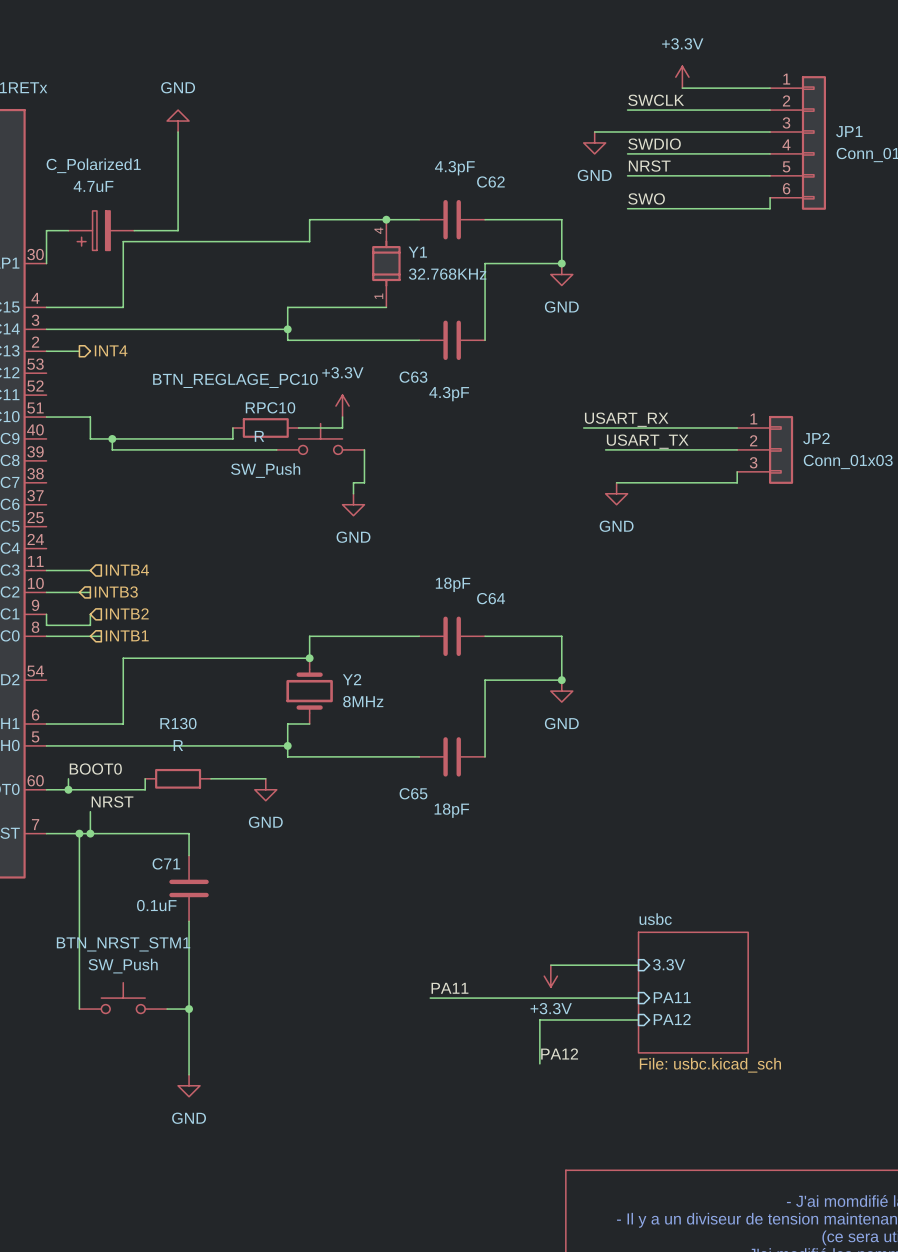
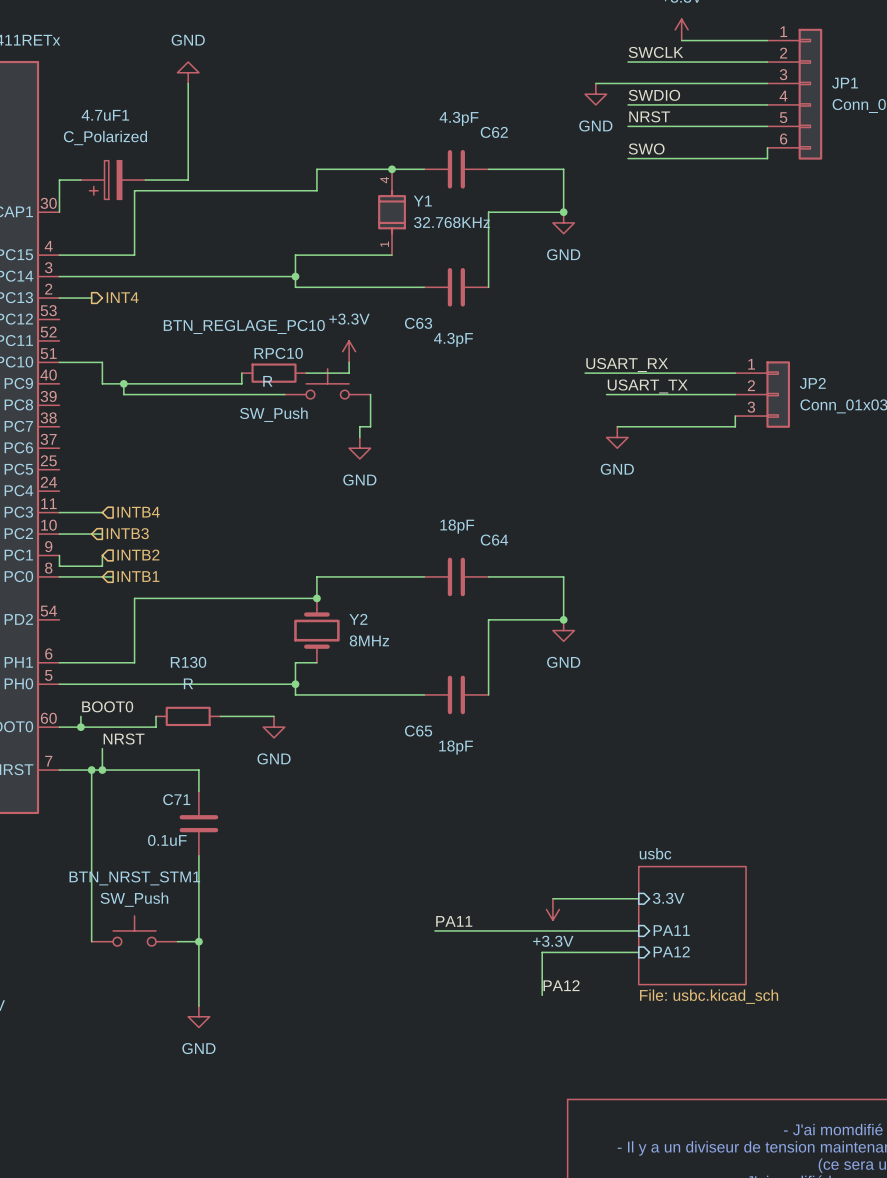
C_Polarized1 name: C_Polarized1 (93, 165) -> 4.7uF1 (105, 115)
C_Polarized1 value: 4.7uF (93, 186) -> C_Polarized (105, 137)

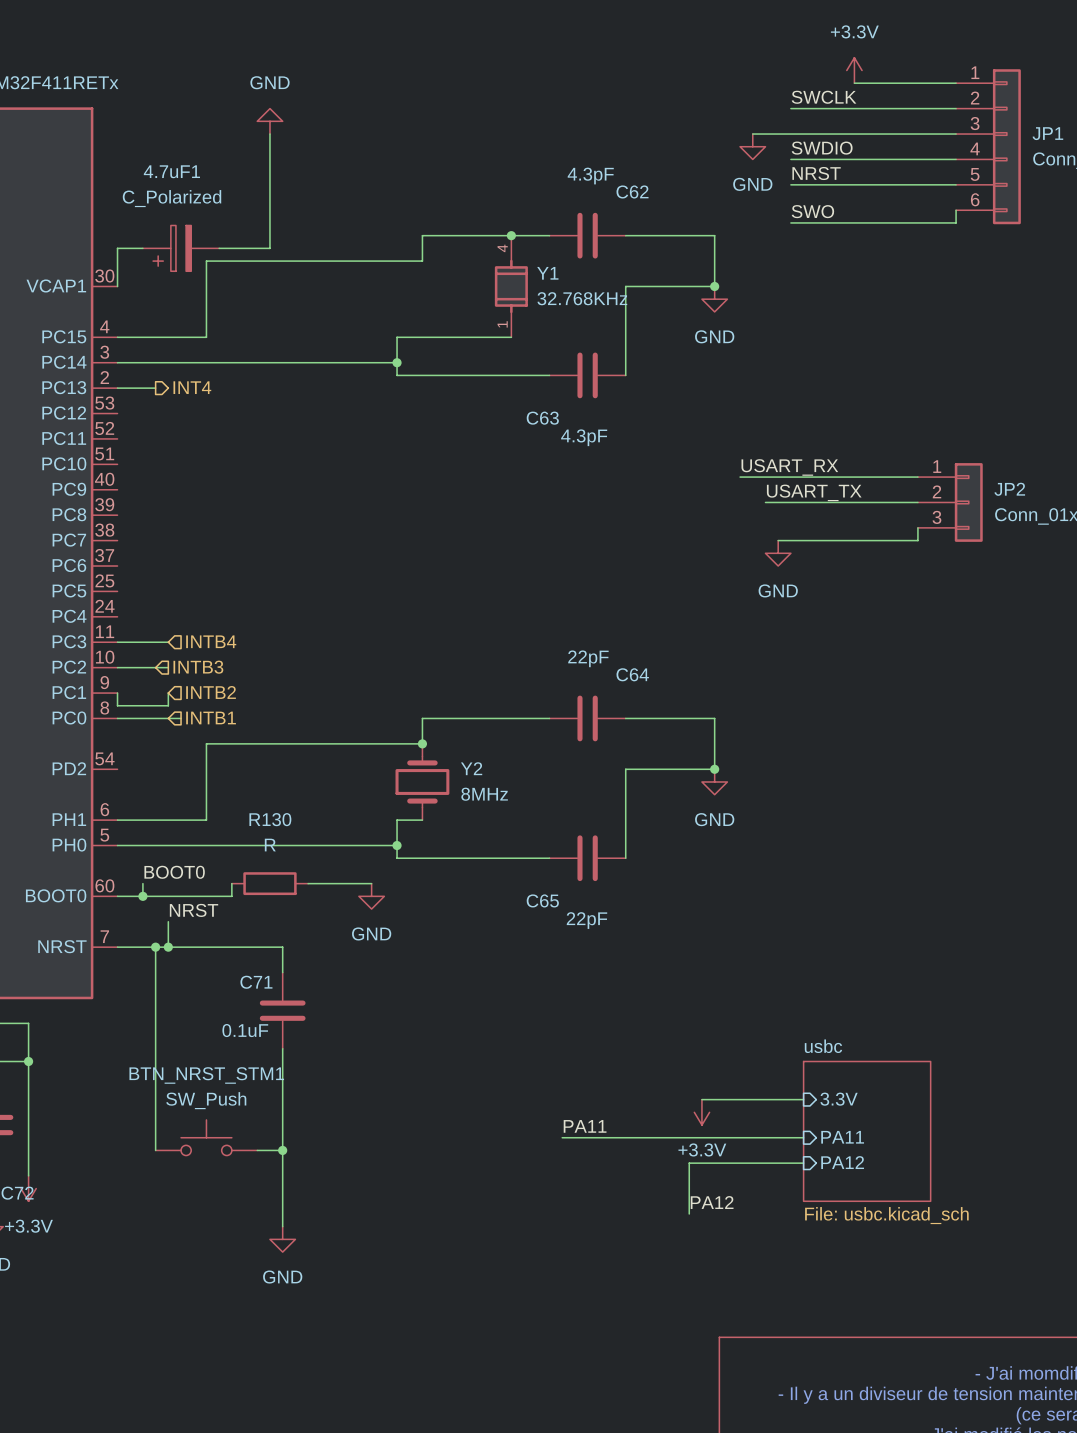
power symbol: +3.3V (349, 351) -> none
wire: (59, 362) (102, 362) (102, 383) (241, 383) (241, 373) -> none
wire: (349, 362) (349, 373) (306, 373) -> none
RPC10: R (274, 373) -> none
wire: (123, 383) (123, 394) (284, 394) -> none
junction: (123, 383) -> none
BTN_REGLAGE_PC10: SW_Push (327, 383) -> none
wire: (370, 394) (370, 426) (359, 426) (359, 437) -> none
power symbol: GND (359, 448) -> none
C64 value: 18pF (457, 526) -> 22pF (588, 658)
C65 value: 18pF (456, 747) -> 22pF (586, 920)

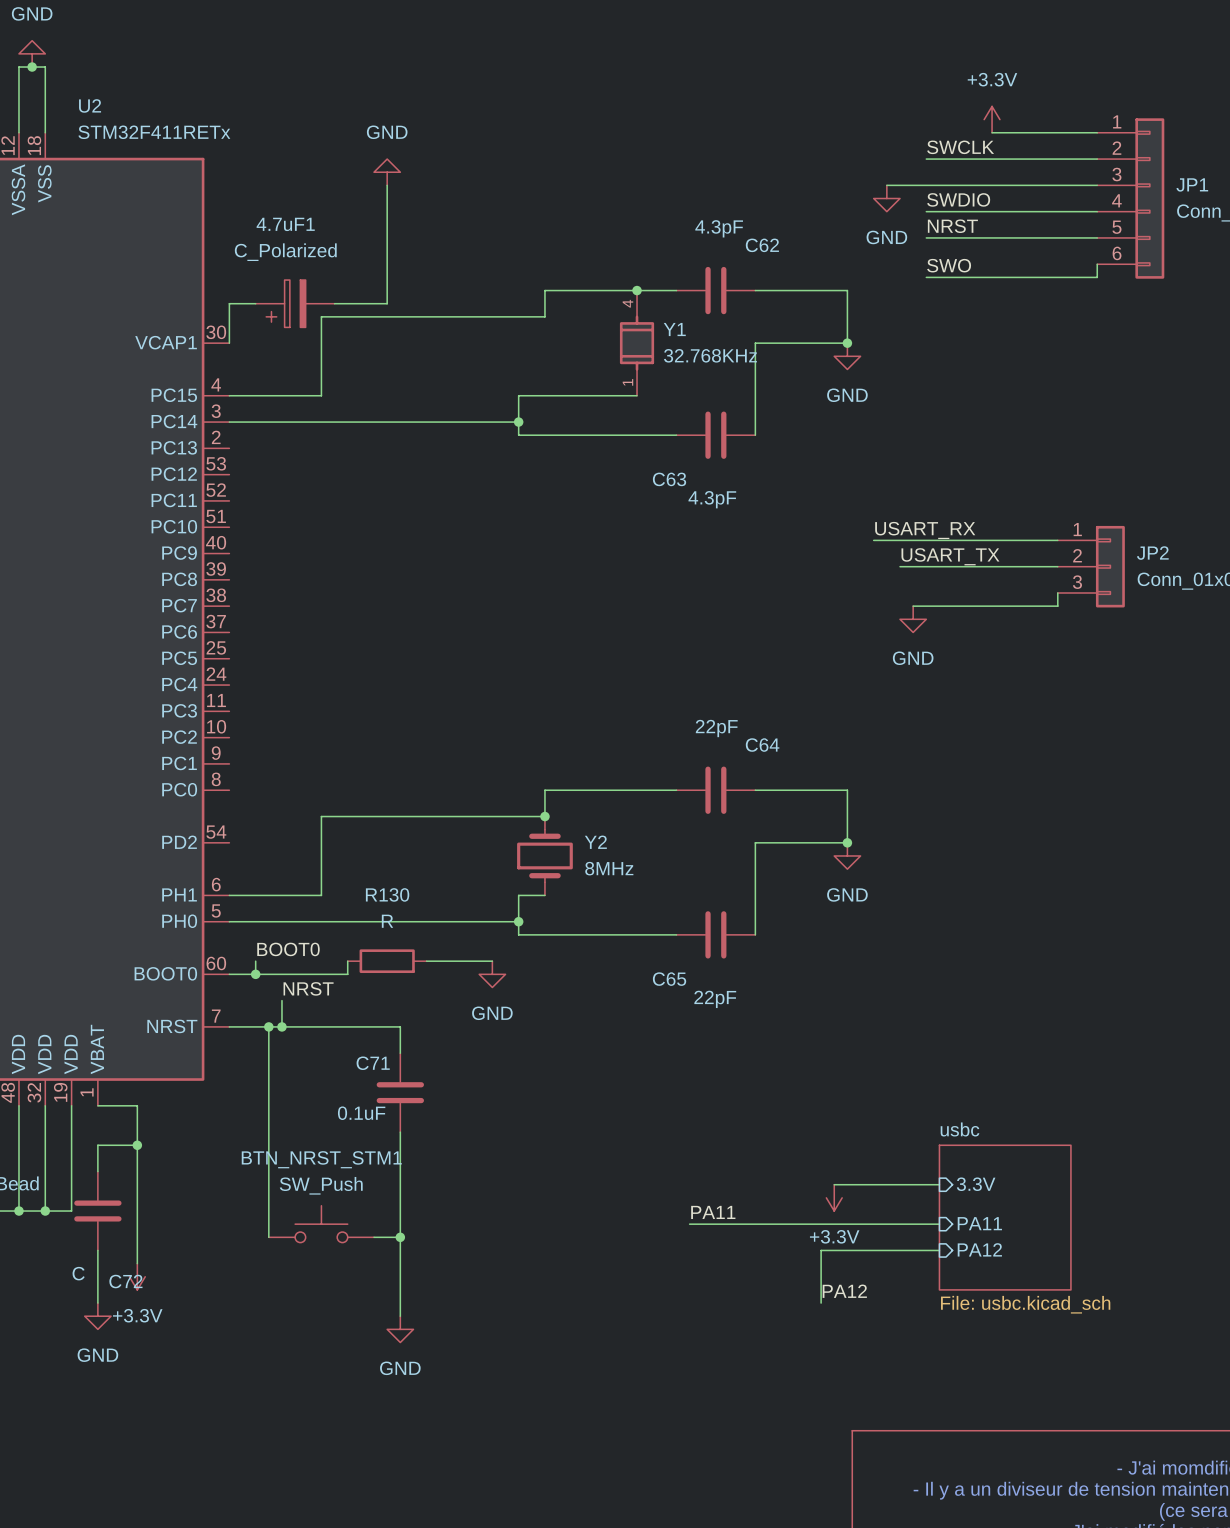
hierarchical label: INT4 (192, 387) -> none
wire: (117, 388) (155, 388) -> none
hierarchical label: INTB4 (211, 641) -> none
wire: (117, 642) (168, 642) -> none
wire: (117, 667) (168, 667) -> none
hierarchical label: INTB3 (198, 667) -> none
hierarchical label: INTB2 (211, 692) -> none
wire: (117, 693) (117, 705) (168, 705) (168, 693) -> none
hierarchical label: INTB1 (211, 717) -> none
wire: (117, 718) (181, 718) -> none

